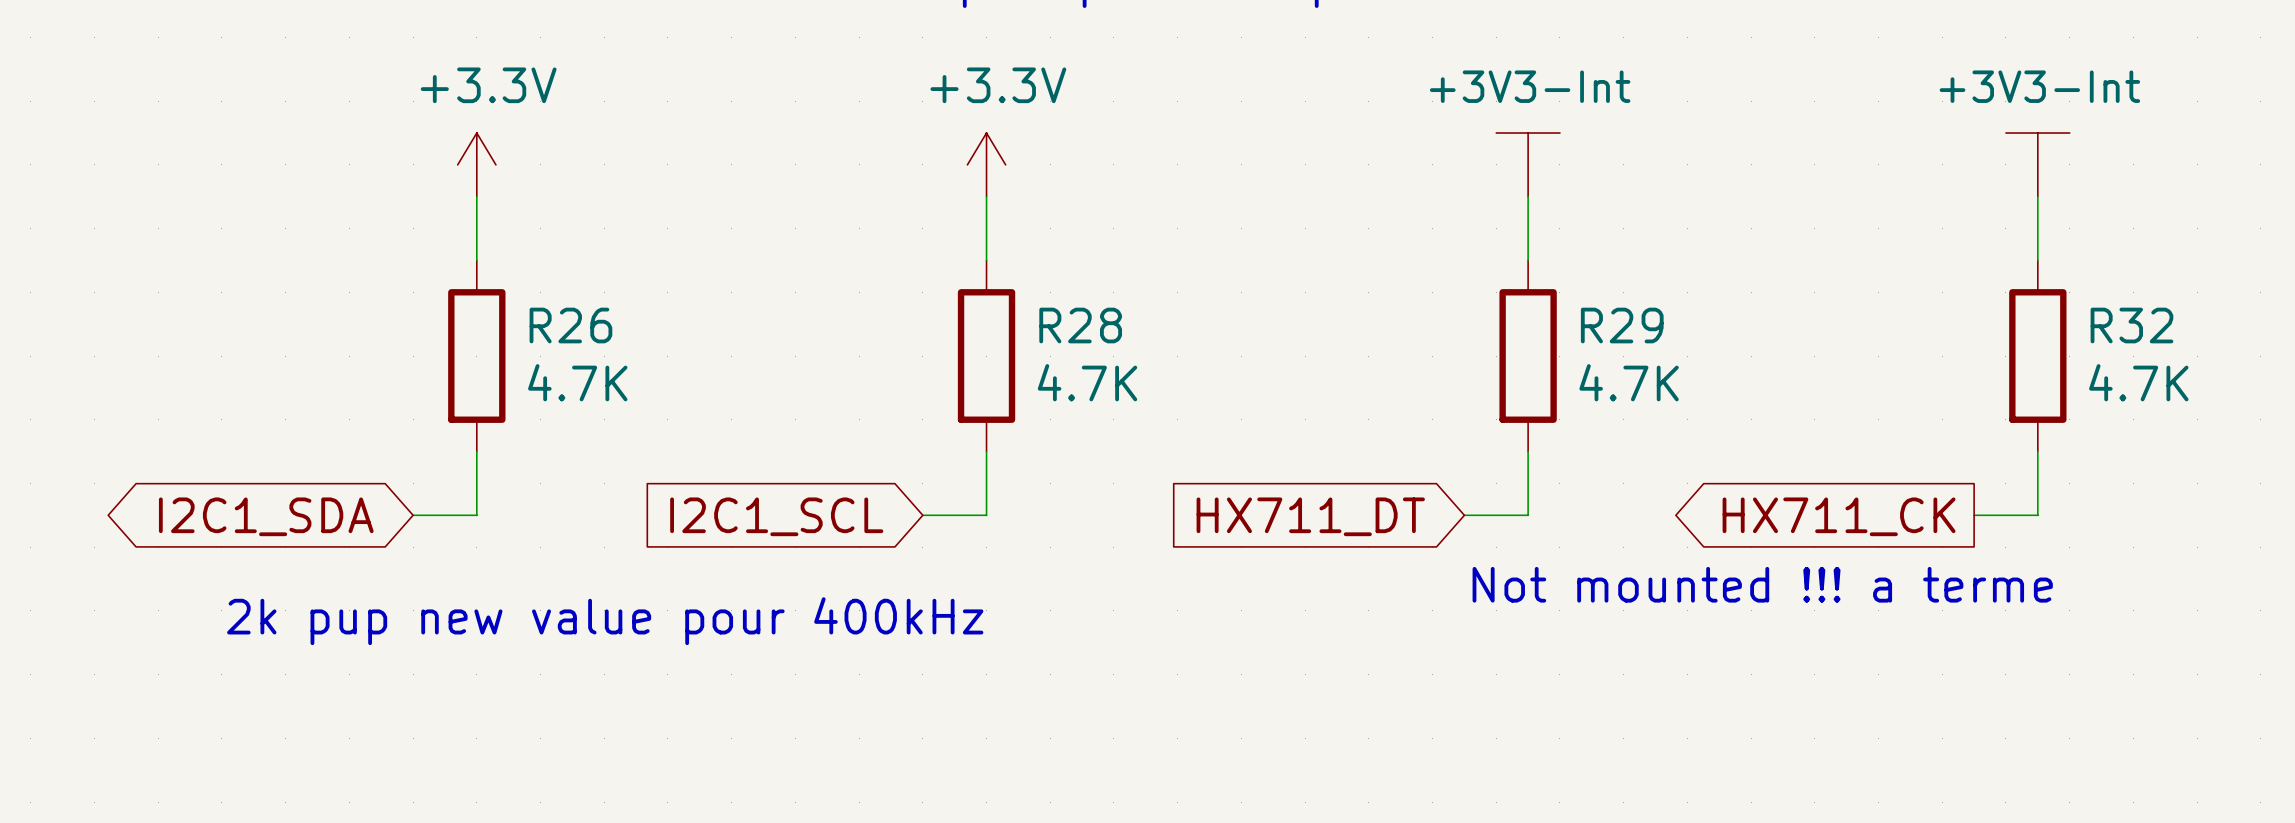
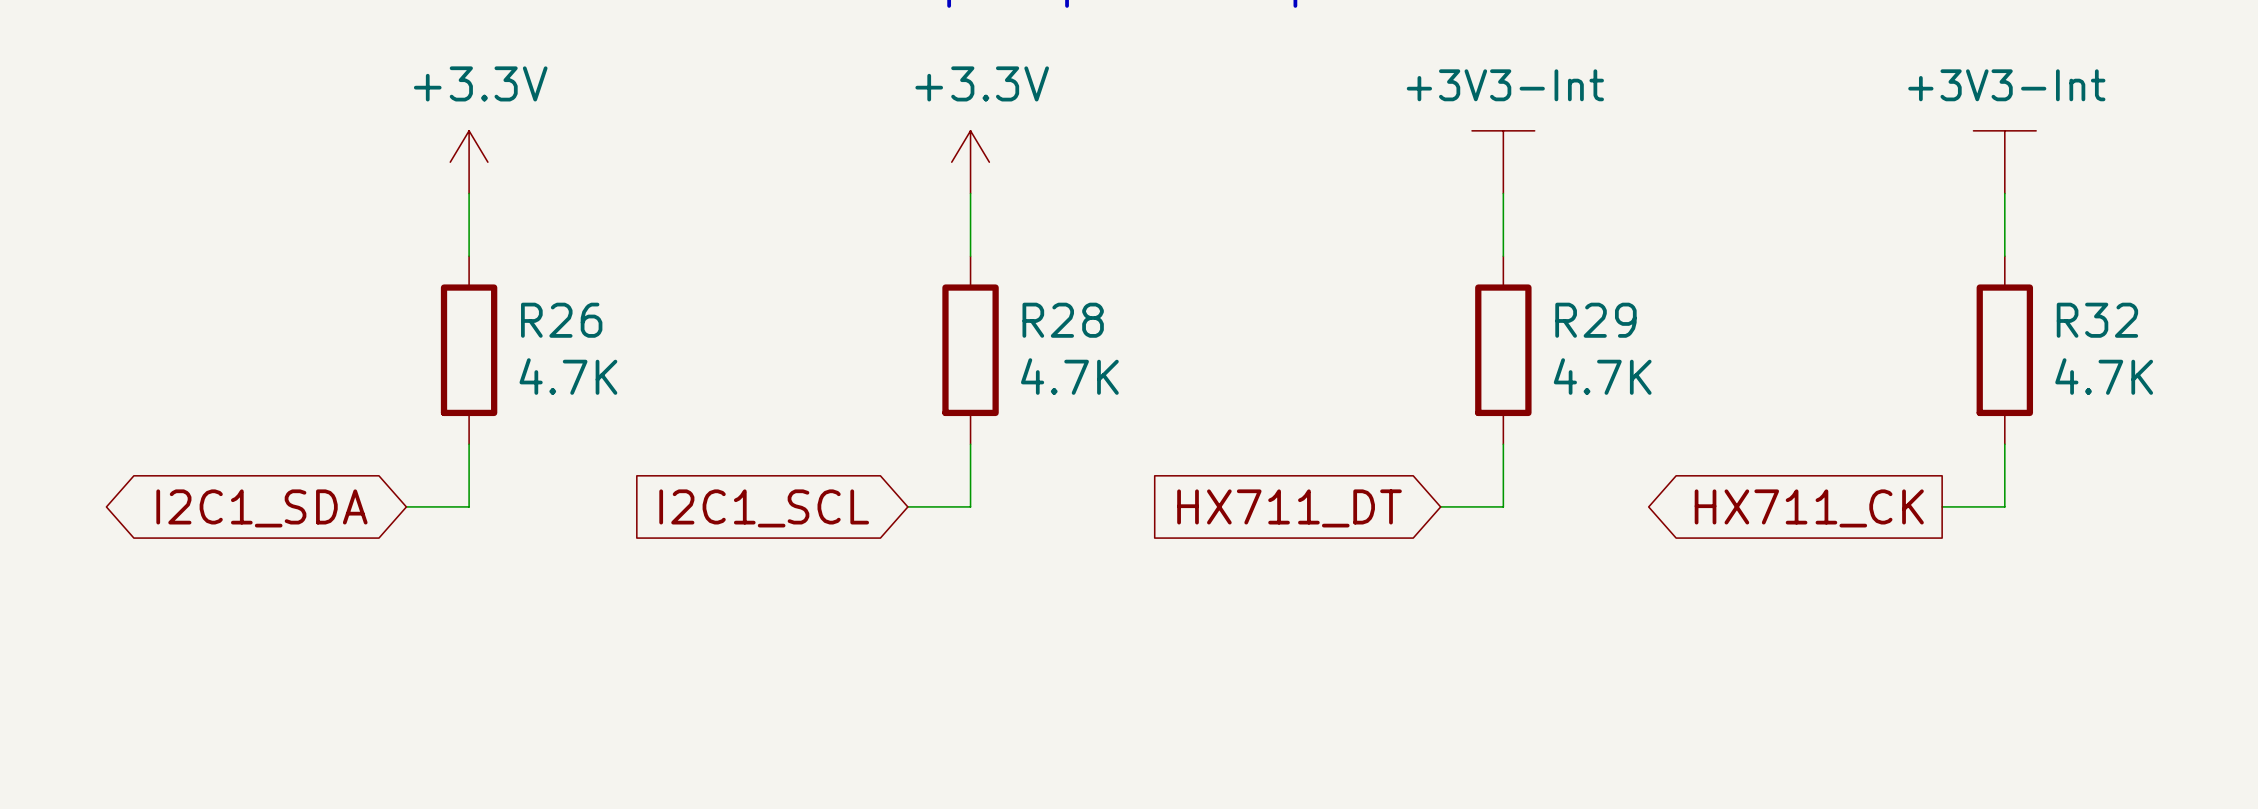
text: Not mounted !!! a terme (1762, 584) -> none
text: 2k pup new value pour 400kHz (605, 621) -> none

